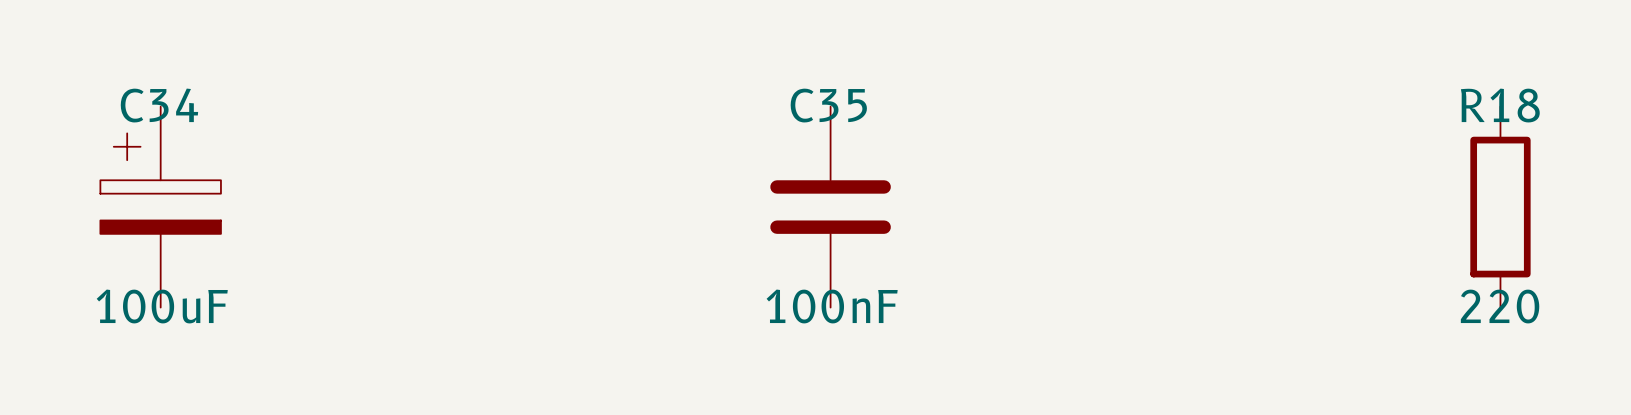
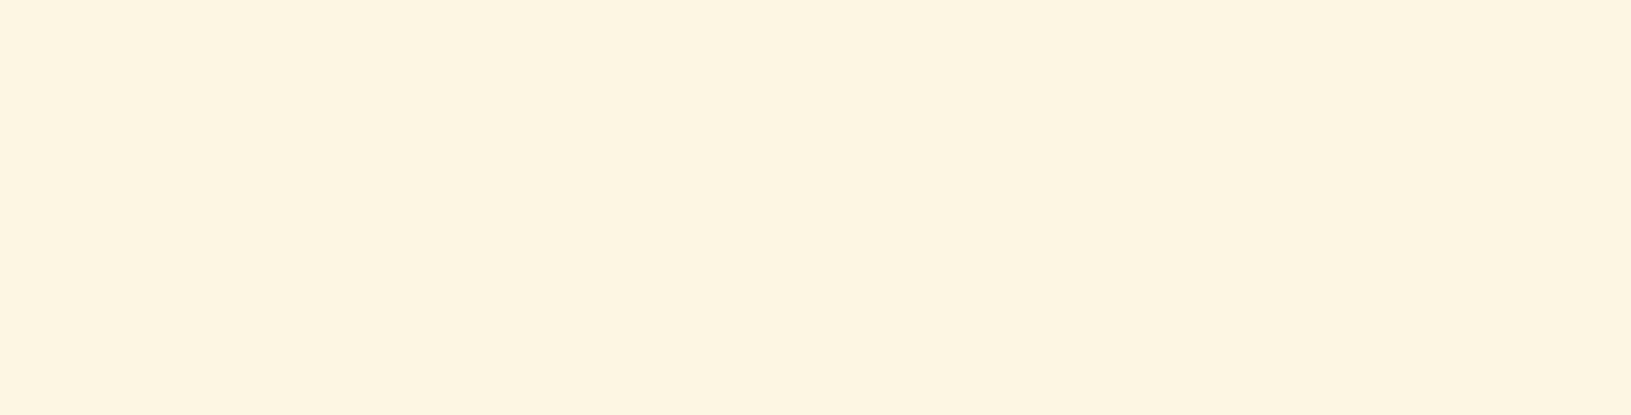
C34: 100uF (160, 207) -> none
C35: 100nF (830, 207) -> none
R18: 220 (1500, 207) -> none

